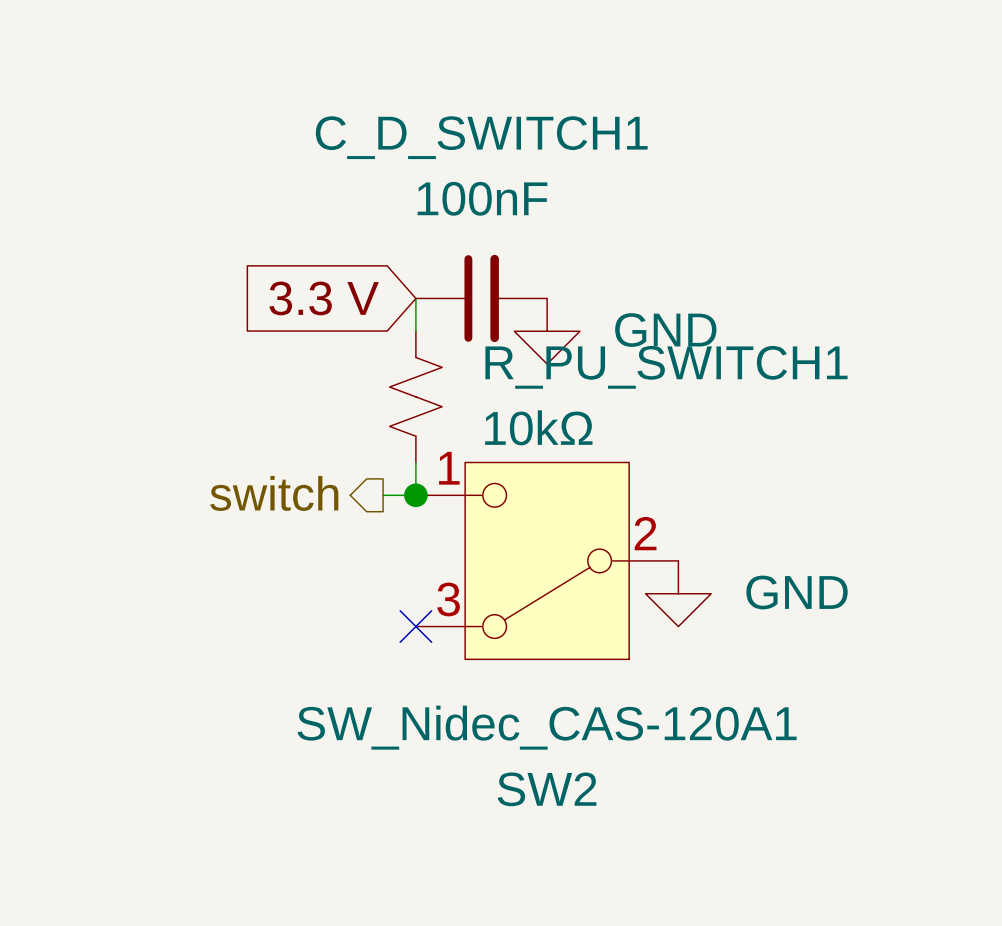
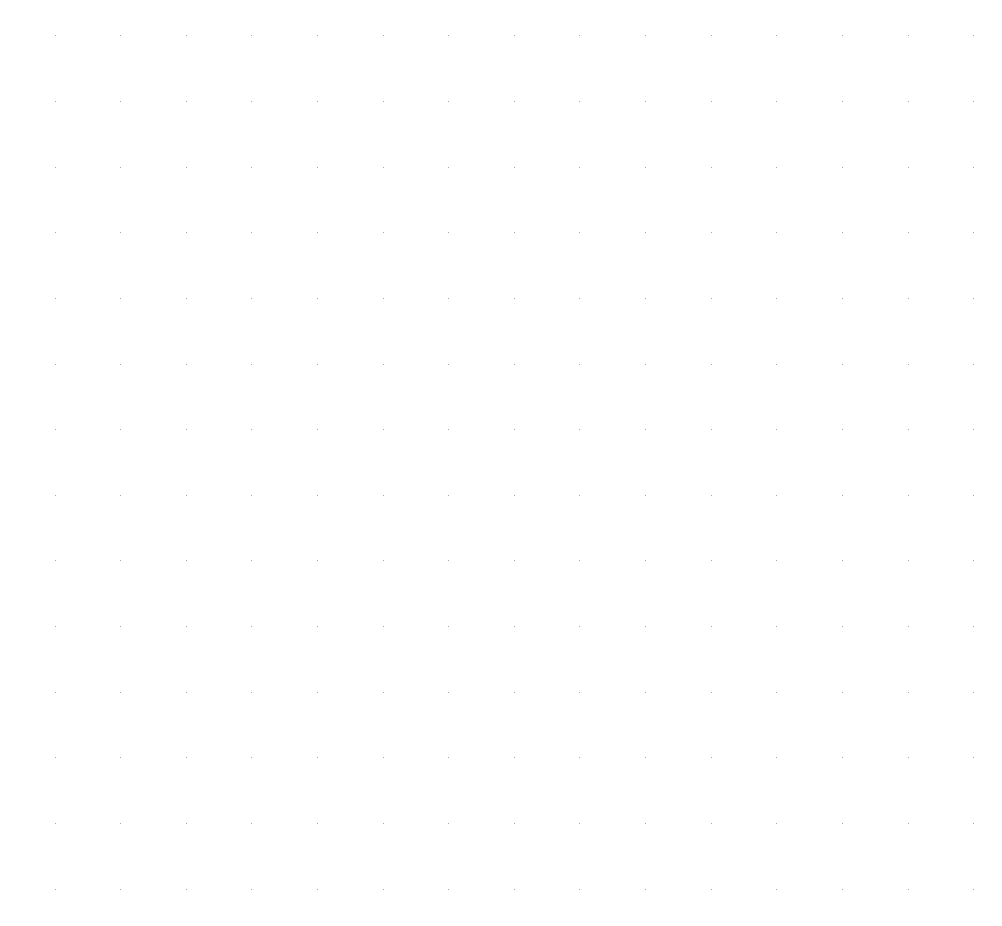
global label: 3.3 V (324, 298) -> none
wire: (415, 298) (415, 331) -> none
C_D_SWITCH1: 100nF (481, 298) -> none
power symbol: GND (547, 331) -> none
R_PU_SWITCH1: 10kΩ (415, 396) -> none
wire: (415, 462) (415, 495) (383, 495) -> none
hierarchical label: switch (274, 493) -> none
junction: (415, 495) -> none
SW2: SW_Nidec_CAS-120A1 (547, 560) -> none
power symbol: GND (678, 593) -> none
no-connect mark: (415, 626) -> none

